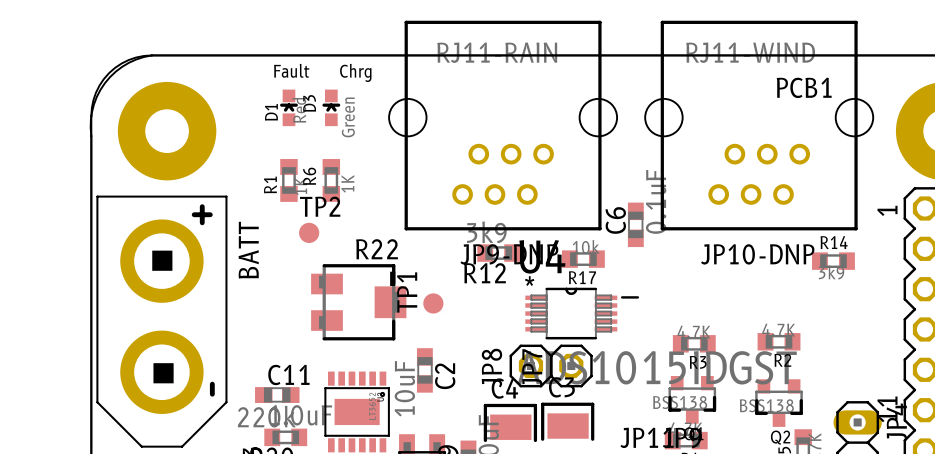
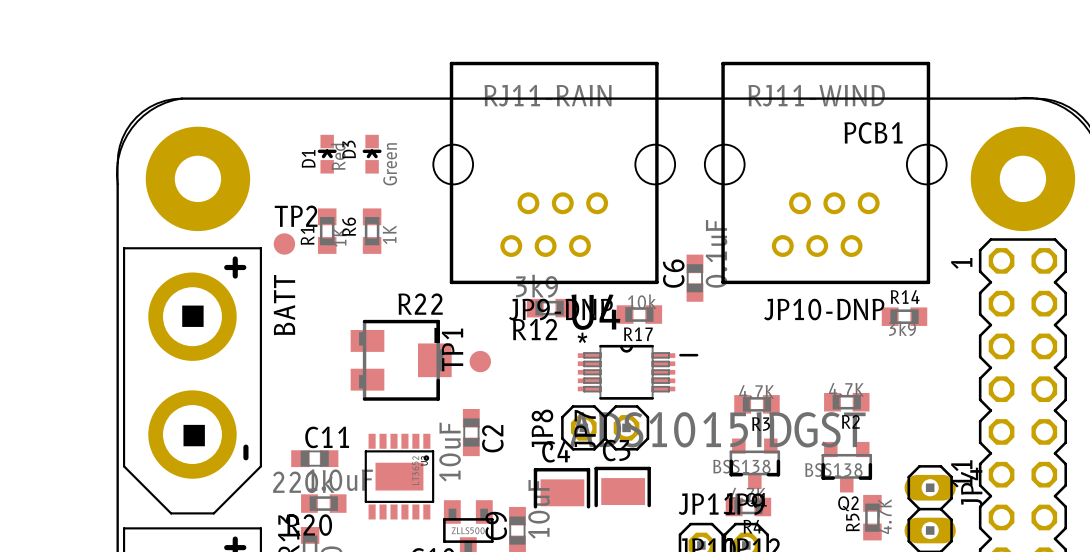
text: Fault (291, 70) -> none
text: Chrg (355, 72) -> none
TP2 position: (309, 232) -> (284, 243)

